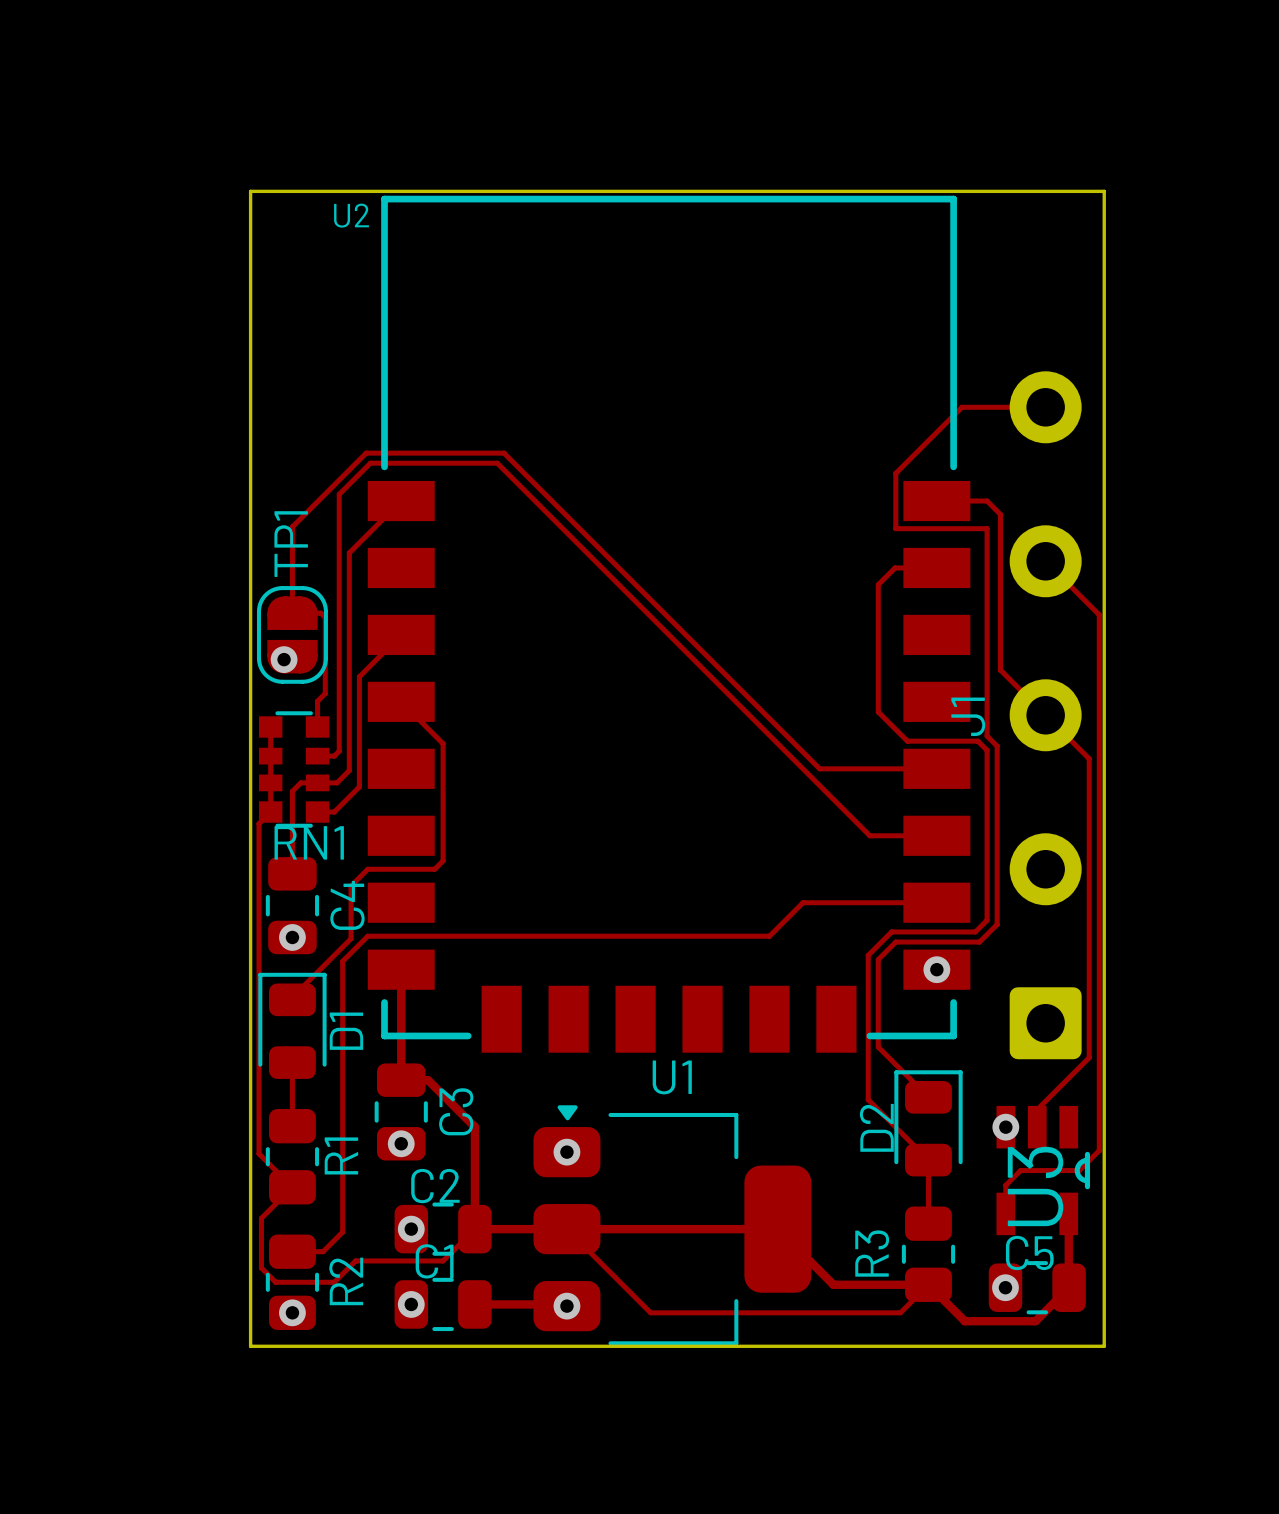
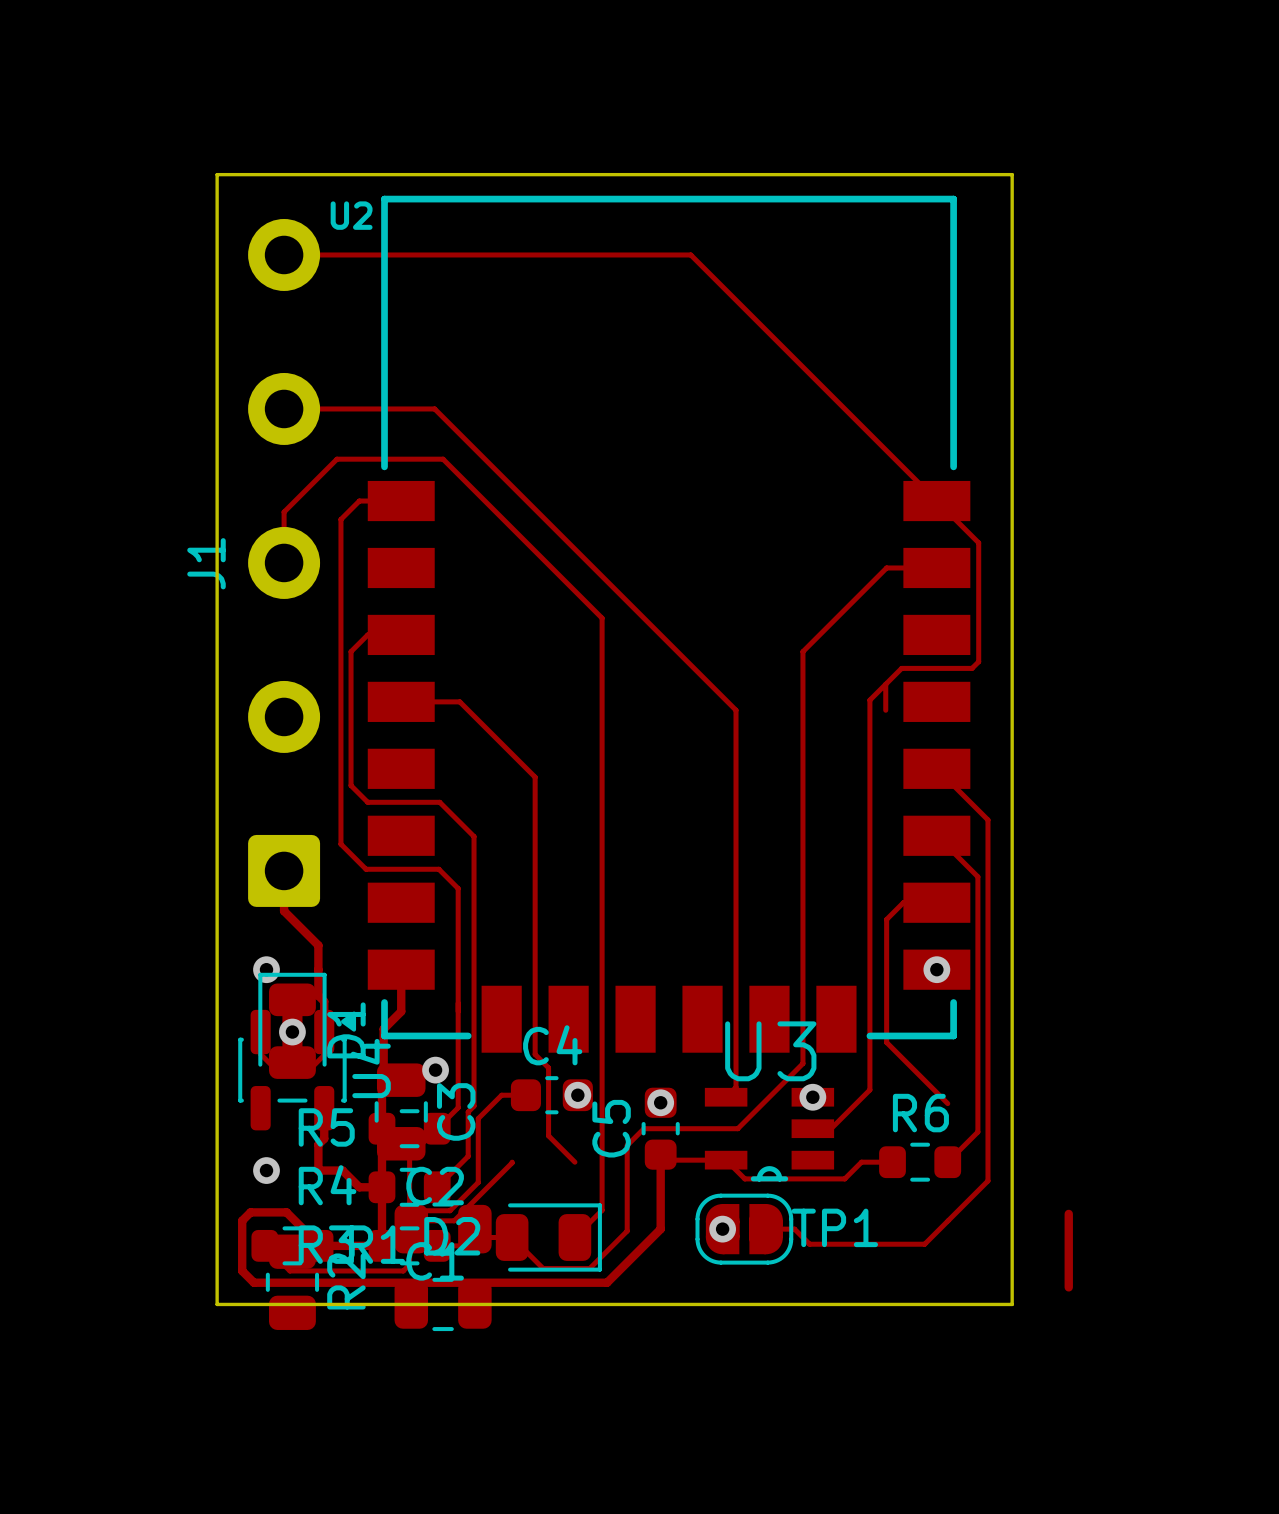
board edge: (250, 191) (1104, 191) (1104, 1346) (250, 1346) (250, 191) -> (217, 174) (217, 1304) (1012, 1304) (1012, 174) (217, 174)
track: none -> (284, 254) (690, 254) (978, 542) (978, 661) (972, 668) (901, 668) (869, 700) (869, 1089) (831, 1128) (812, 1128)
track: (1045, 407) (961, 407) (895, 473) (895, 528) (987, 528) (987, 736) (997, 746) (997, 924) (979, 942) (895, 942) (878, 959) (878, 1047) (928, 1097) -> none
track: none -> (284, 408) (434, 408) (736, 710) (736, 1087) (726, 1097)
track: (390, 489) (401, 501) (349, 552) (349, 770) (336, 782) (300, 782) (292, 791) (292, 873) (284, 865) -> none
track: (936, 501) (987, 501) (1000, 514) (1000, 670) (1089, 758) (1089, 1057) (1037, 1109) (1037, 1127) -> none
track: (1045, 561) (1099, 614) (1099, 1150) (1079, 1170) (1020, 1170) (1005, 1185) (1005, 1213) -> none
track: none -> (284, 562) (284, 512) (336, 459) (443, 459) (602, 618) (602, 1210) (574, 1237)
track: (895, 567) (878, 584) (878, 711) (907, 741) (977, 741) (987, 750) (987, 920) (975, 931) (891, 931) (868, 955) (868, 1099) (928, 1160) (928, 1223) -> (895, 567) (886, 567) (802, 651) (802, 1063) (737, 1128) (643, 1128) (627, 1145) (627, 1231) (589, 1268) (543, 1268) (512, 1237) (476, 1237) (468, 1245) (437, 1245)
TP1 rotation: 0° (292, 634) -> 90° clockwise (744, 1229)
TP1 position: (292, 634) -> (744, 1229)
track: none -> (384, 634) (367, 634) (351, 651) (351, 785) (367, 802) (439, 802) (474, 836) (474, 1106) (468, 1111) (468, 1156) (437, 1187)
track: (401, 634) (359, 676) (359, 786) (334, 812) (317, 812) -> none
via: (284, 659) -> none
track: none -> (885, 684) (885, 710)
track: (401, 701) (443, 743) (443, 860) (434, 869) -> (401, 701) (459, 701) (535, 777) (535, 1054) (548, 1067) (548, 1135) (574, 1162)
J1 position: (1045, 715) -> (284, 562)
track: (270, 726) (270, 812) (258, 823) (258, 1153) (292, 1187) (261, 1218) (261, 1268) (275, 1282) (334, 1282) (355, 1260) (443, 1260) (474, 1229) -> none
track: (317, 726) (317, 701) (325, 693) (325, 617) (320, 613) (292, 613) (292, 526) (366, 453) (503, 453) (819, 768) (936, 768) -> none
track: (317, 756) (334, 756) (339, 751) (339, 494) (370, 463) (497, 463) (869, 835) (936, 835) -> (947, 1162) (977, 1132) (977, 876) (936, 835)
RN1: (294, 769) -> none
C4 footprint: [265, 857, 320, 955] -> [510, 1076, 593, 1115]
track: (367, 869) (351, 886) (351, 938) (292, 997) (292, 999) -> (367, 869) (340, 844) (340, 519) (359, 501) (401, 501)
track: none -> (434, 869) (438, 869) (458, 888) (458, 1107) (409, 1156) (409, 1204) (416, 1210) (450, 1210) (478, 1182) (478, 1118) (501, 1095) (525, 1095)
track: none -> (284, 870) (284, 911) (318, 945) (318, 995) (324, 1001) (324, 1055) (309, 1070) (276, 1070) (260, 1054) (260, 1032)
track: (903, 902) (802, 902) (769, 936) (367, 936) (342, 961) (342, 1232) (322, 1251) (292, 1251) -> (903, 902) (886, 919) (886, 1042) (947, 1103)
C4 name position: C4 (347, 905) -> C4 (552, 1045)
via position: (292, 937) -> (266, 969)
track: (401, 1011) (401, 1080) (428, 1080) (474, 1127) (474, 1229) -> (401, 1011) (383, 1029) (381, 1245) (320, 1245) (286, 1212) (250, 1212) (242, 1220) (242, 1270) (253, 1282) (607, 1282) (660, 1229) (660, 1154) (666, 1160) (726, 1160) (744, 1178) (844, 1178) (861, 1162) (892, 1162)
via: none -> (292, 1032)
track: (292, 1062) (292, 1126) -> none
U4: none -> (297, 1070)
via: none -> (435, 1070)
via: none -> (577, 1095)
via: none -> (812, 1097)
via: none -> (660, 1102)
track: none -> (324, 1108) (324, 1138) (318, 1144) (318, 1170) (342, 1170) (359, 1187) (381, 1187)
R1 footprint: [265, 1109, 320, 1205] -> [251, 1226, 334, 1266]
D2 rotation: 0° (928, 1123) -> 90° clockwise (548, 1237)
D2 position: (928, 1123) -> (548, 1237)
via: (1005, 1127) -> none
R5: none -> (409, 1128)
via: (401, 1143) -> none
via: (566, 1152) -> none
track: none -> (512, 1162) (454, 1220) (417, 1220) (409, 1229) (409, 1264) (403, 1270) (289, 1270) (264, 1245)
R6: none -> (920, 1162)
via: none -> (266, 1170)
U3 rotation: 0° (1043, 1170) -> 90° clockwise (769, 1134)
U3 position: (1043, 1170) -> (769, 1134)
U3 name position: U3 (1035, 1186) -> U3 (770, 1051)
R4: none -> (409, 1187)
R3 footprint: [901, 1206, 956, 1302] -> [368, 1226, 451, 1266]
U1: (672, 1225) -> none
via: (411, 1229) -> none
track: (474, 1229) (766, 1229) -> none
track: (566, 1229) (650, 1312) (900, 1312) (928, 1284) -> none
via: none -> (722, 1229)
track: (777, 1229) (833, 1284) (928, 1284) -> (777, 1229) (794, 1229) (809, 1244) (924, 1244) (987, 1180) (987, 819) (936, 768)
C5 footprint: [988, 1261, 1086, 1315] -> [641, 1087, 680, 1170]
track: (928, 1284) (964, 1321) (1035, 1321) (1069, 1287) -> none
via: (1005, 1287) -> none
via: (411, 1304) -> none
track: (474, 1304) (565, 1304) (566, 1306) -> none
via: (566, 1306) -> none
via: (292, 1312) -> none

